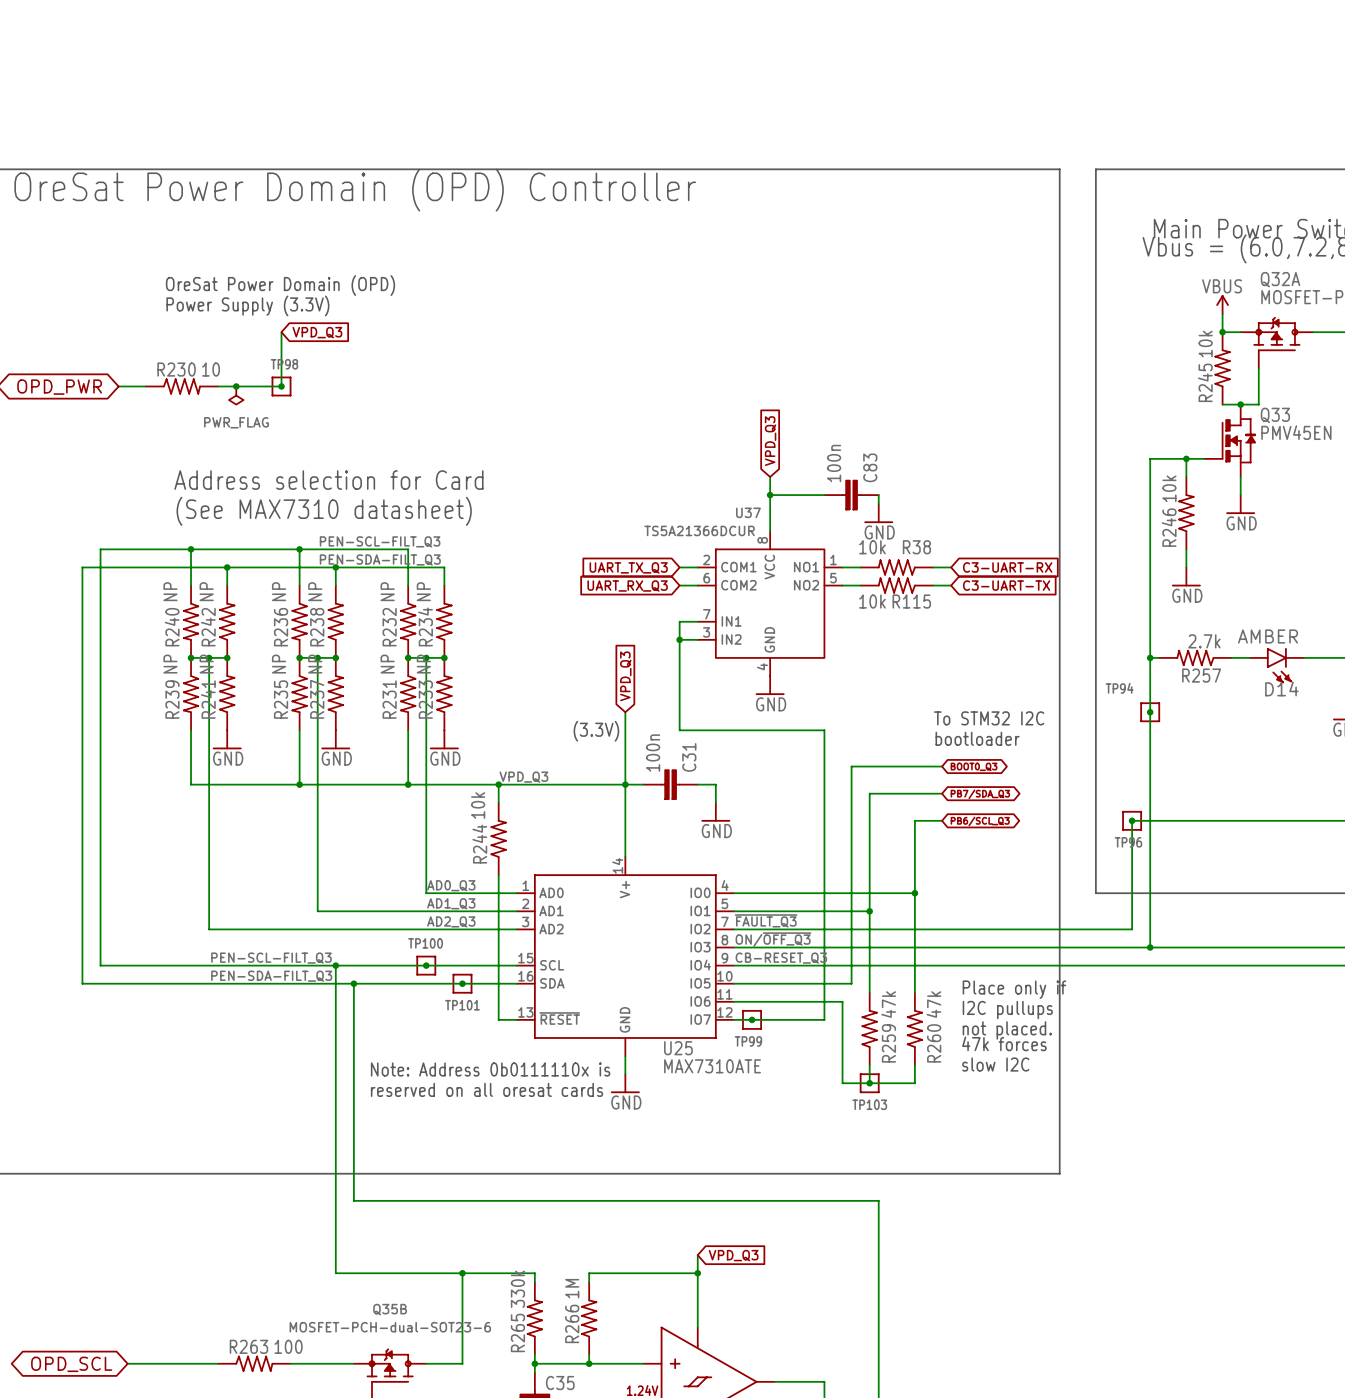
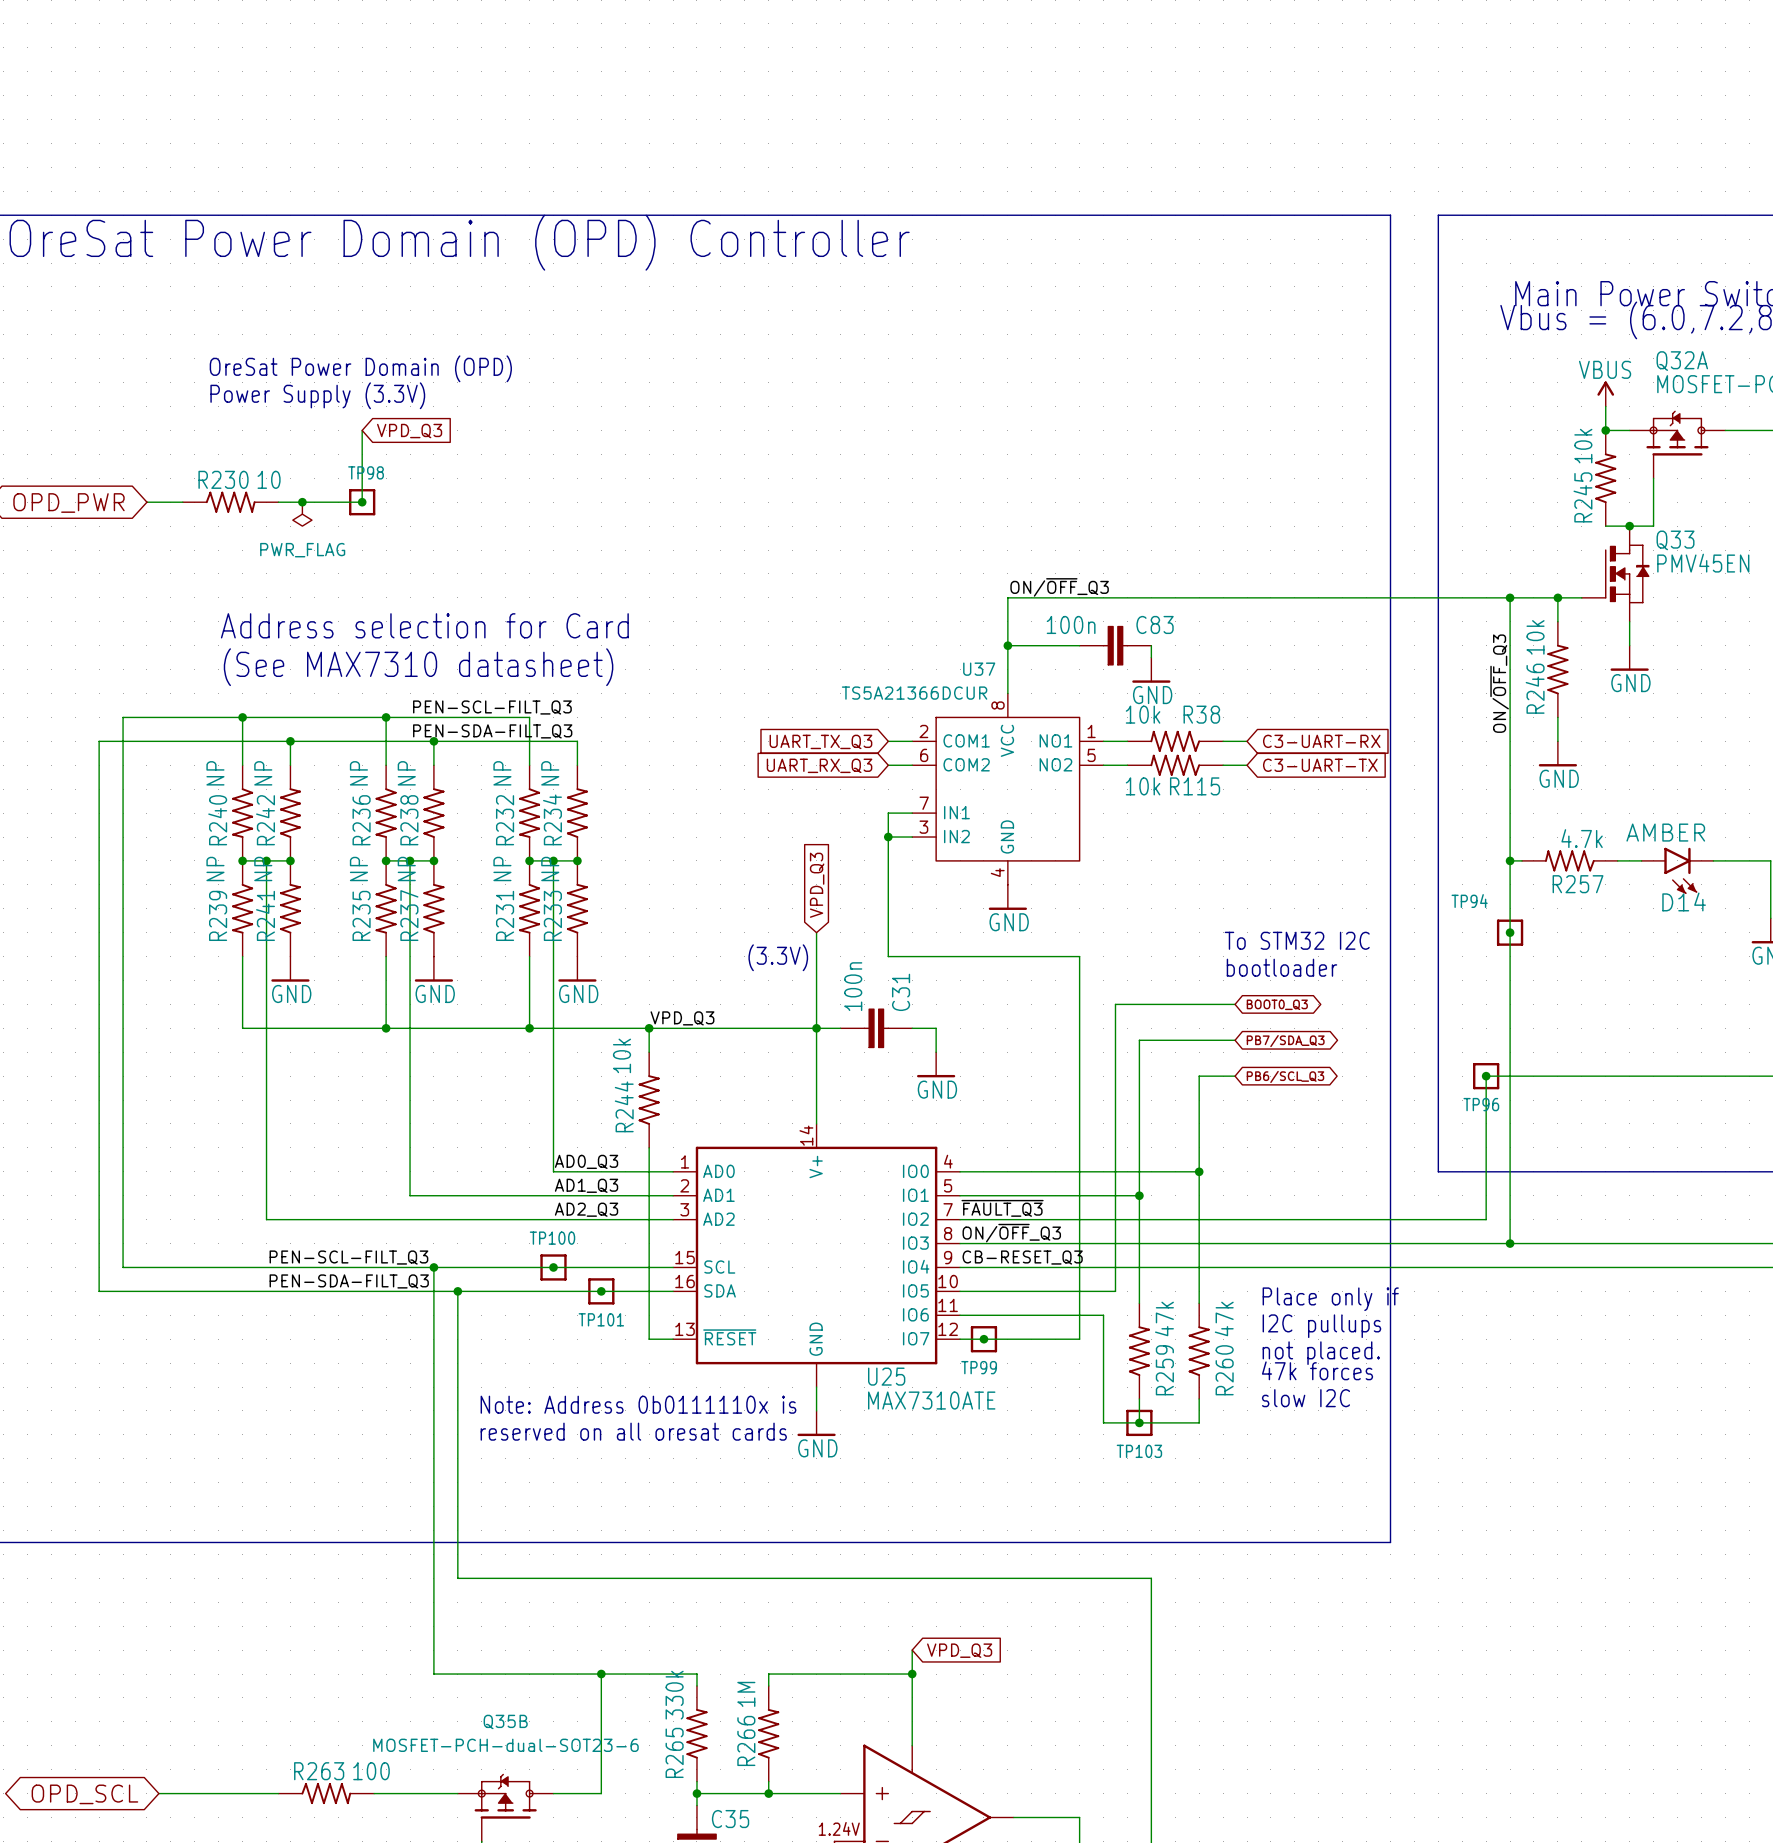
global label: VPD_Q3 (770, 441) -> none
label: none -> ON/~{OFF}_Q3 (1059, 587)
wire: none -> (1510, 597) (1007, 597) (1007, 621)
junction: none -> (1510, 597)
C83 value rotation: 0° (834, 463) -> 90° clockwise (1071, 624)
C83 name rotation: 0° (870, 467) -> 90° clockwise (1155, 624)
label: none -> ON/~{OFF}_Q3 (1499, 683)
R257 value: 2.7k (1204, 641) -> 4.7k (1582, 838)
label: ON/~{OFF_Q3} (773, 939) -> ON/~{OFF}_Q3 (1011, 1233)

